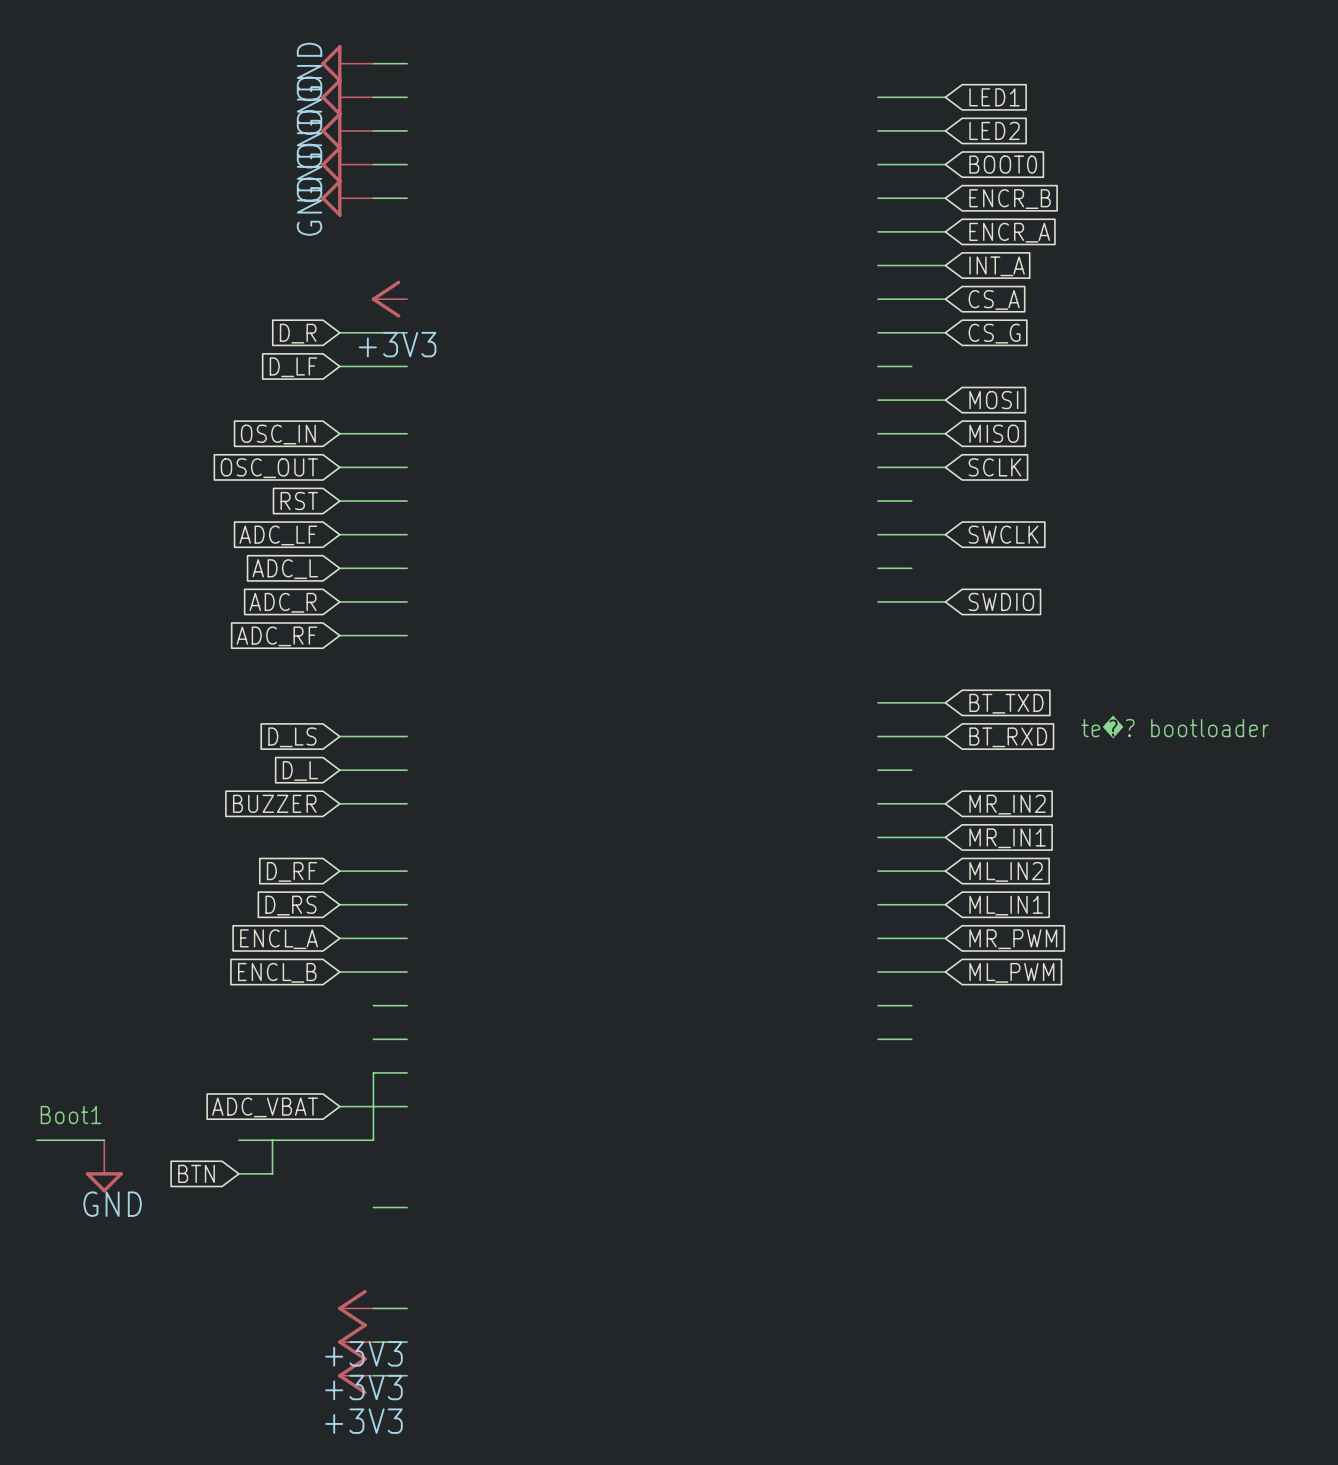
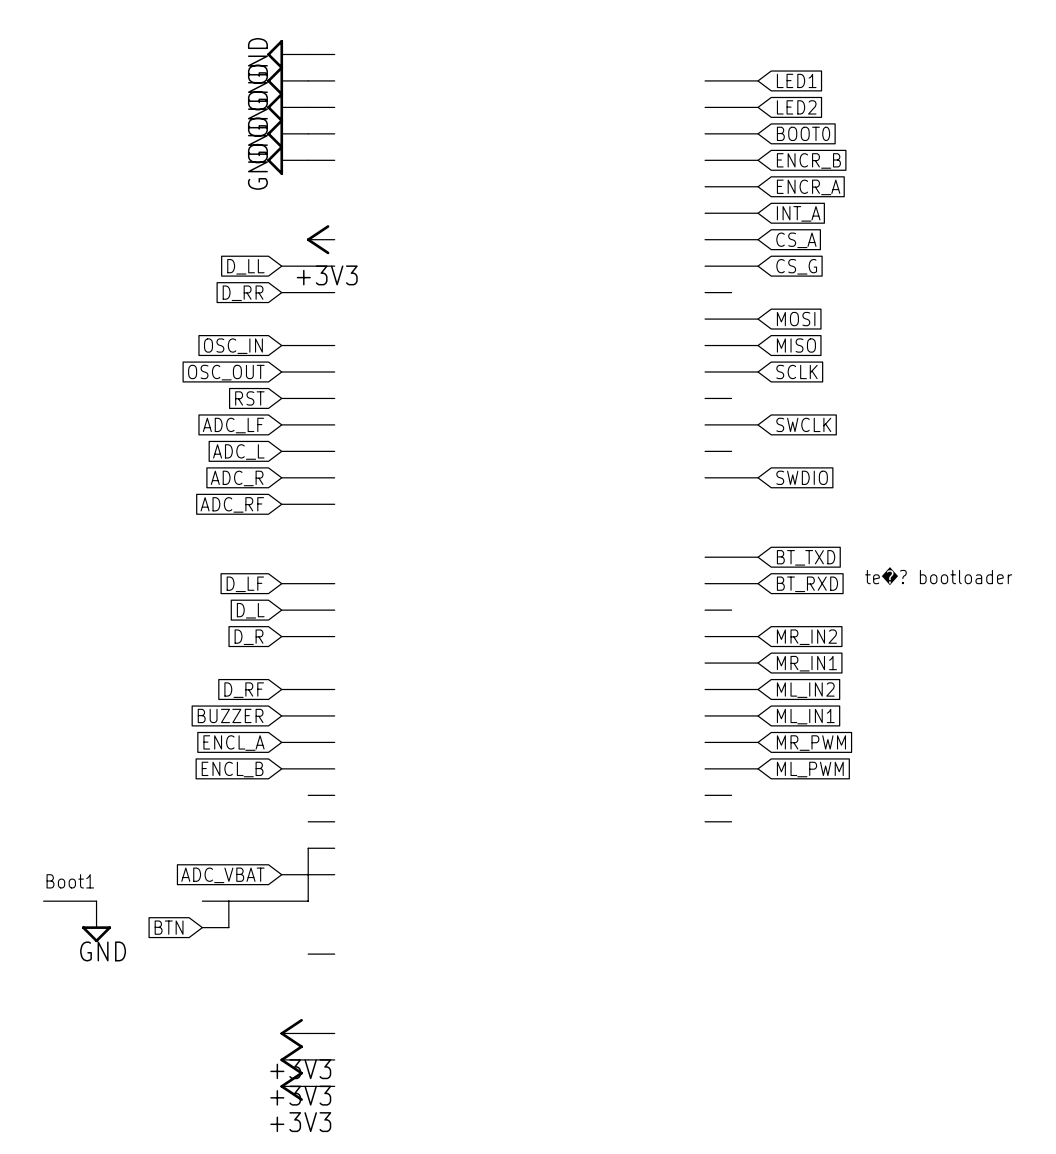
global label: D_R (298, 333) -> D_LL (245, 266)
global label: D_LF (293, 367) -> D_RR (243, 293)
global label: D_LS (292, 737) -> D_LF (245, 584)
global label: BUZZER (274, 803) -> D_R (249, 637)
global label: D_RS (290, 905) -> BUZZER (230, 715)

